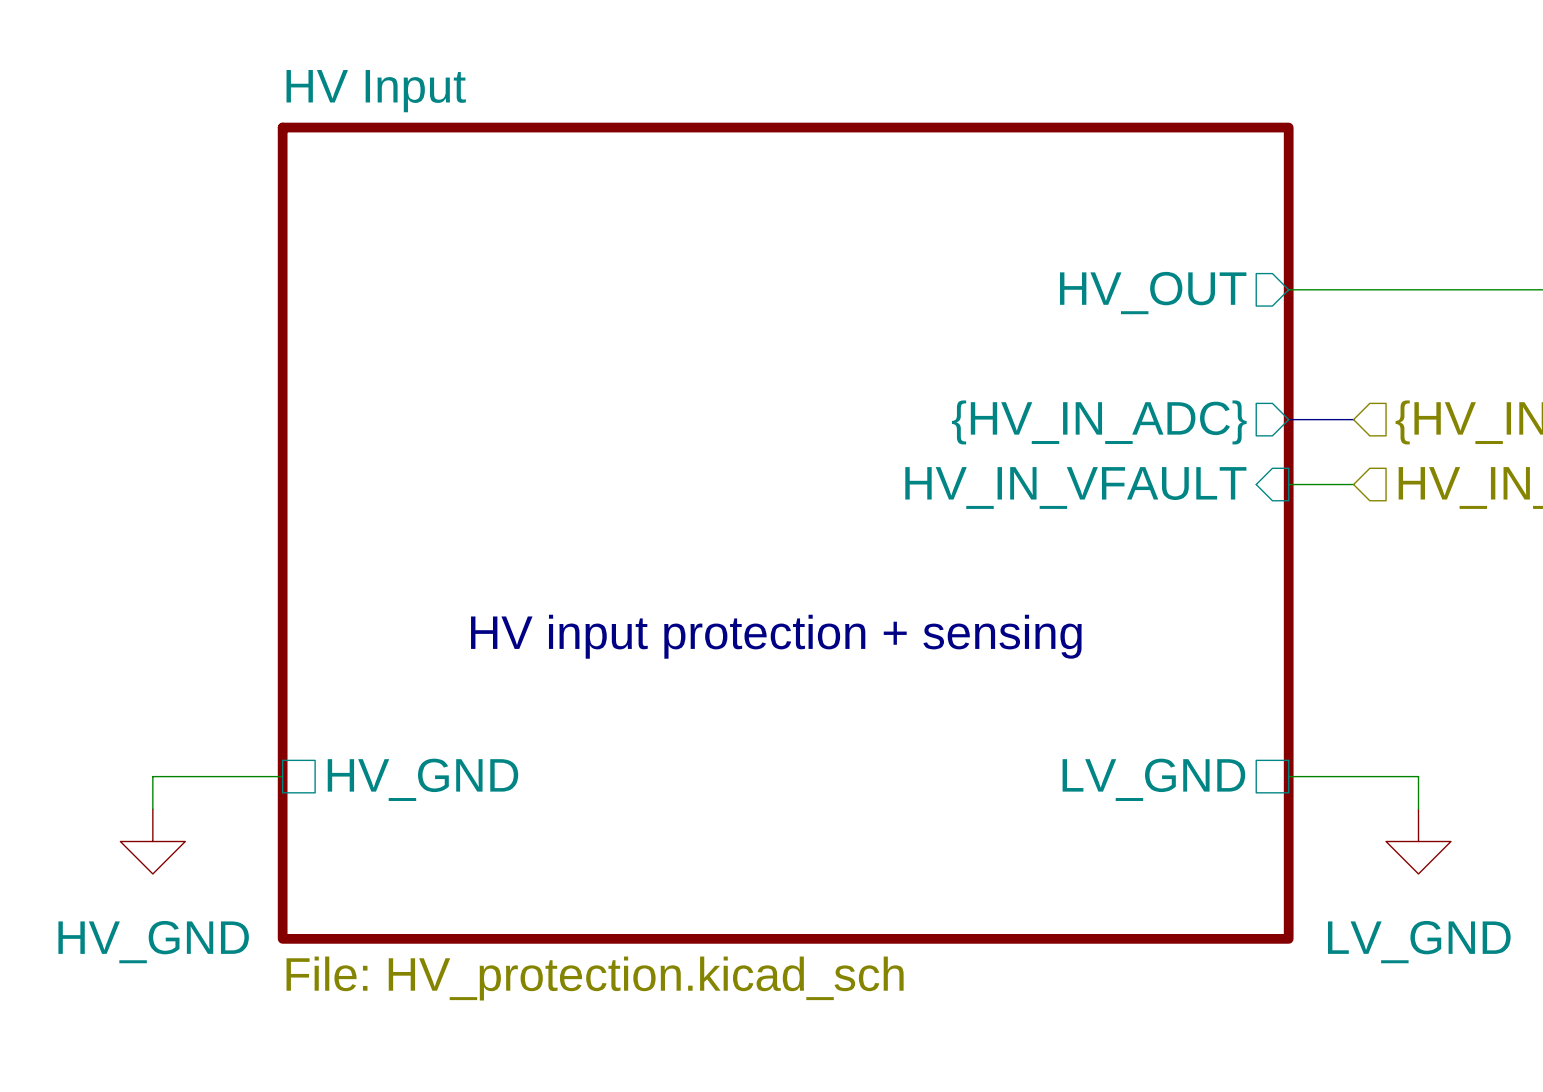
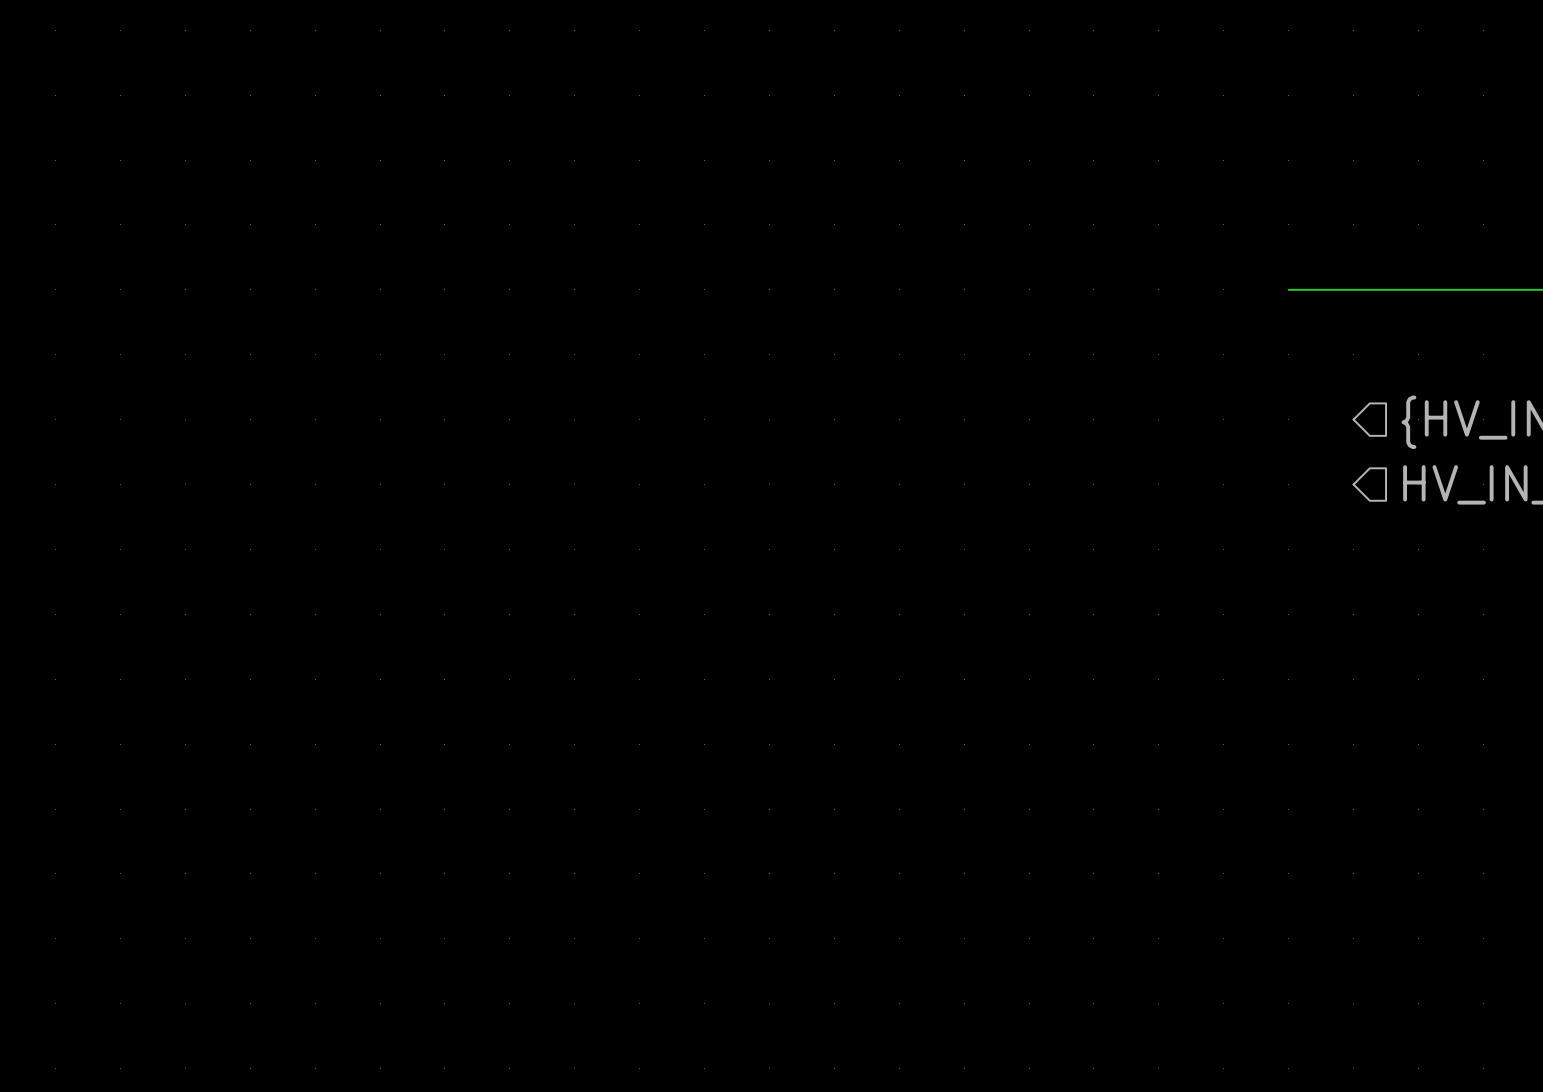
sheet pin: HV_OUT (1153, 293) -> none
bus: (1288, 419) (1353, 419) -> none
sheet pin: {HV_IN_ADC} (1099, 422) -> none
wire: (1288, 484) (1353, 484) -> none
sheet pin: HV_IN_VFAULT (1075, 488) -> none
sheet HV Input: File: HV_protection.kicad_sch (785, 533) -> none
text: HV input protection + sensing (776, 636) -> none
wire: (282, 776) (152, 776) (152, 809) -> none
wire: (1288, 776) (1418, 776) (1418, 809) -> none
sheet pin: HV_GND (422, 779) -> none
sheet pin: LV_GND (1153, 779) -> none
power symbol: HV_GND (152, 841) -> none
power symbol: LV_GND (1418, 841) -> none

